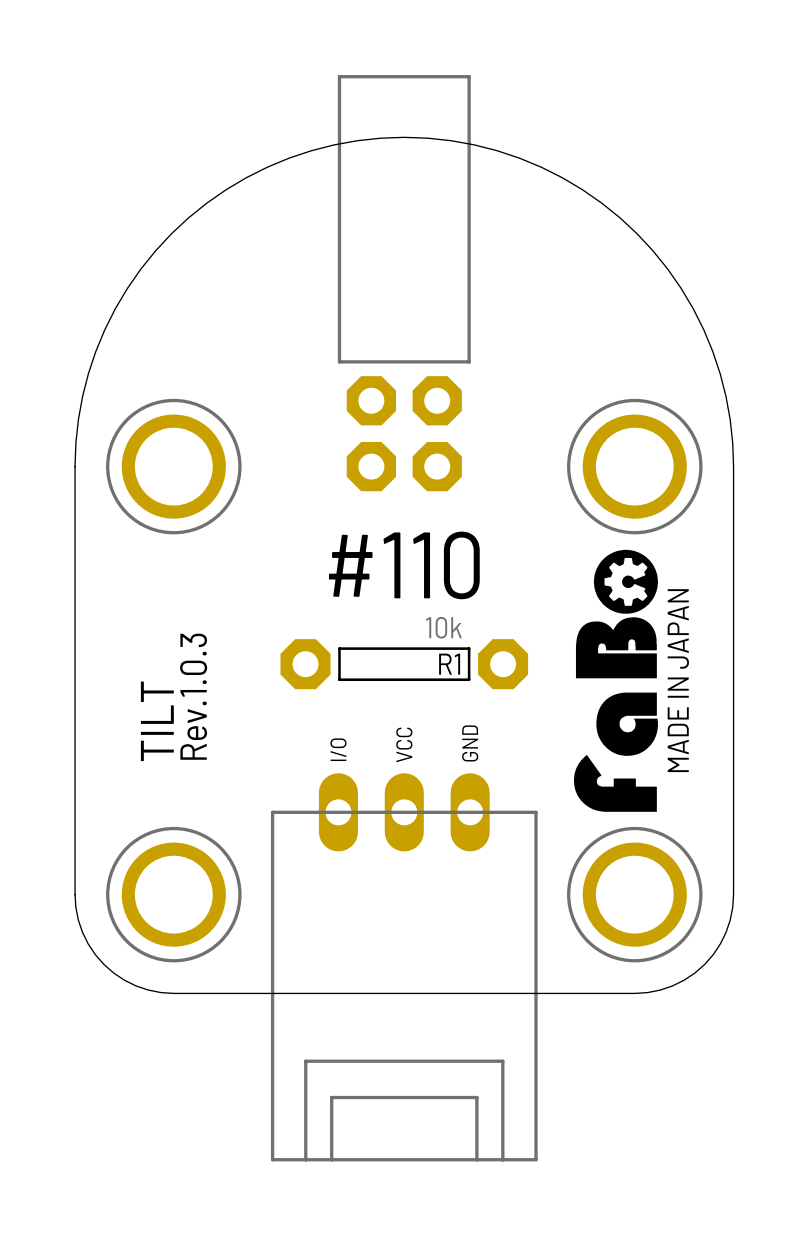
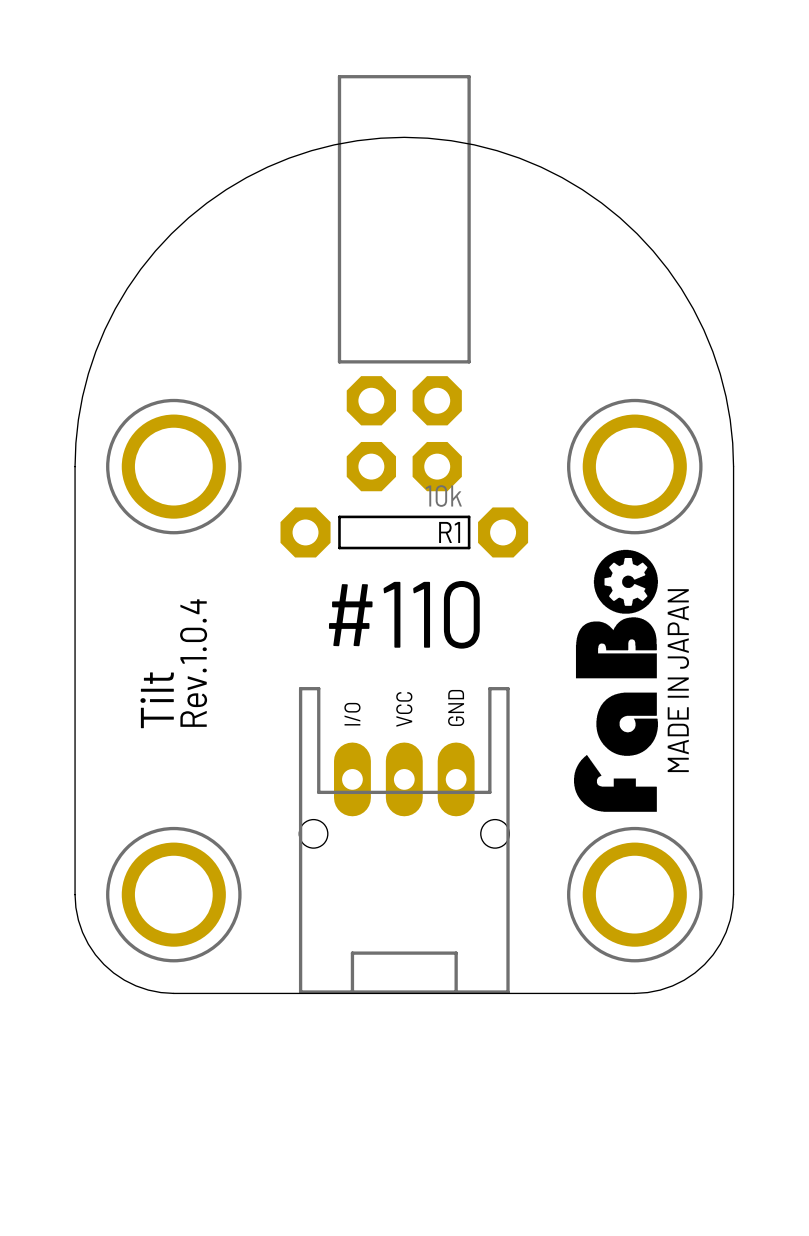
text position: #110 (404, 565) -> #110 (404, 614)
part: none -> (404, 565)
part: (404, 649) -> none
R1 position: (404, 664) -> (404, 532)
text: Rev.1.0.3 (193, 696) -> Rev.1.0.4 (193, 663)
text: none -> Tilt (157, 700)
text: TILT (157, 721) -> none

